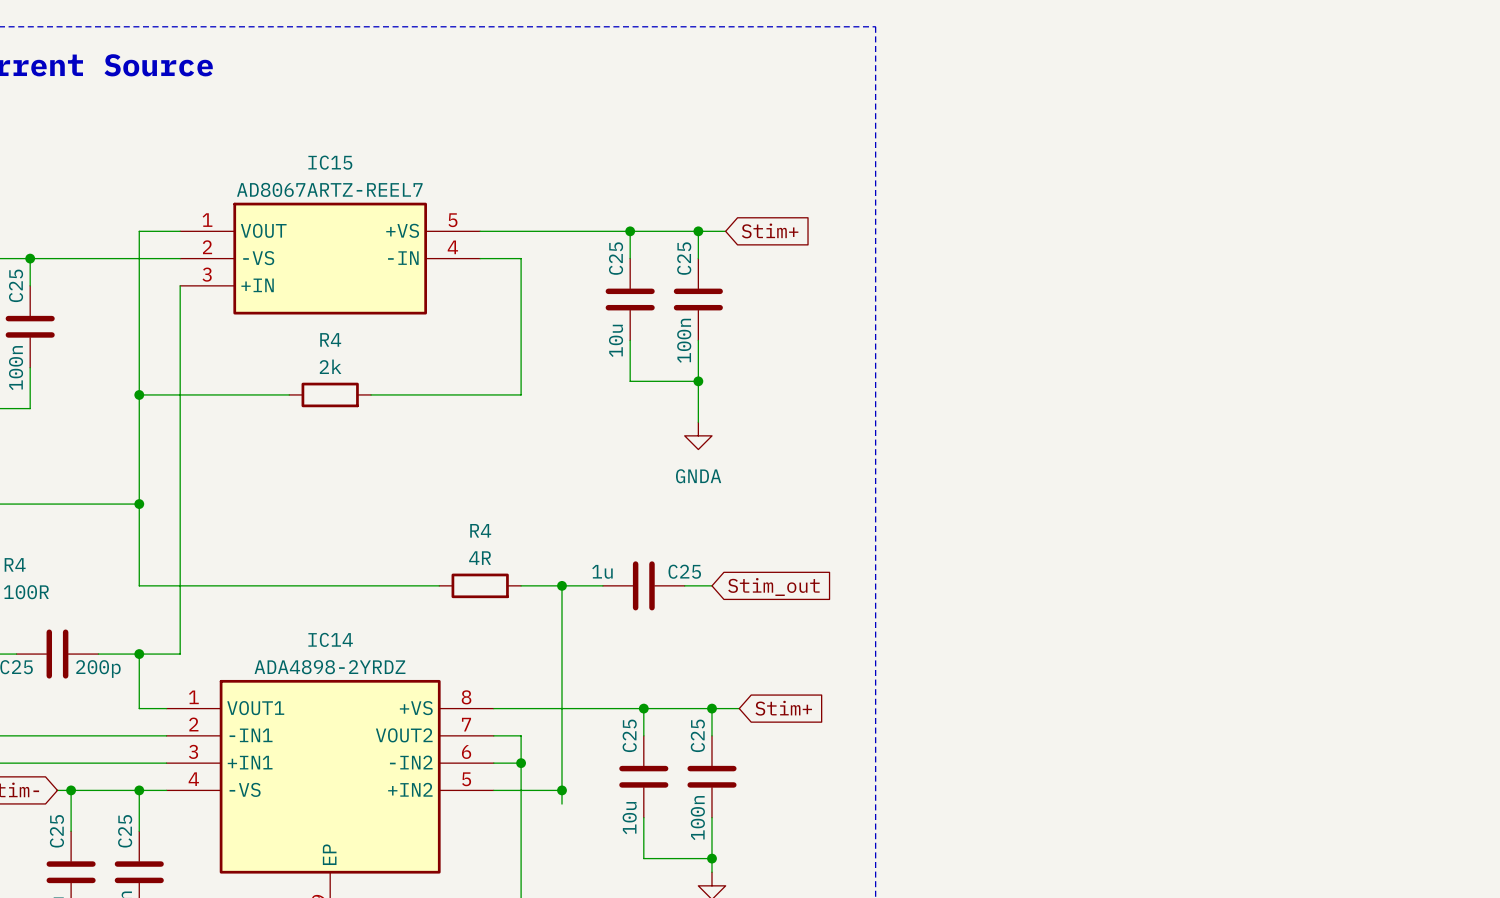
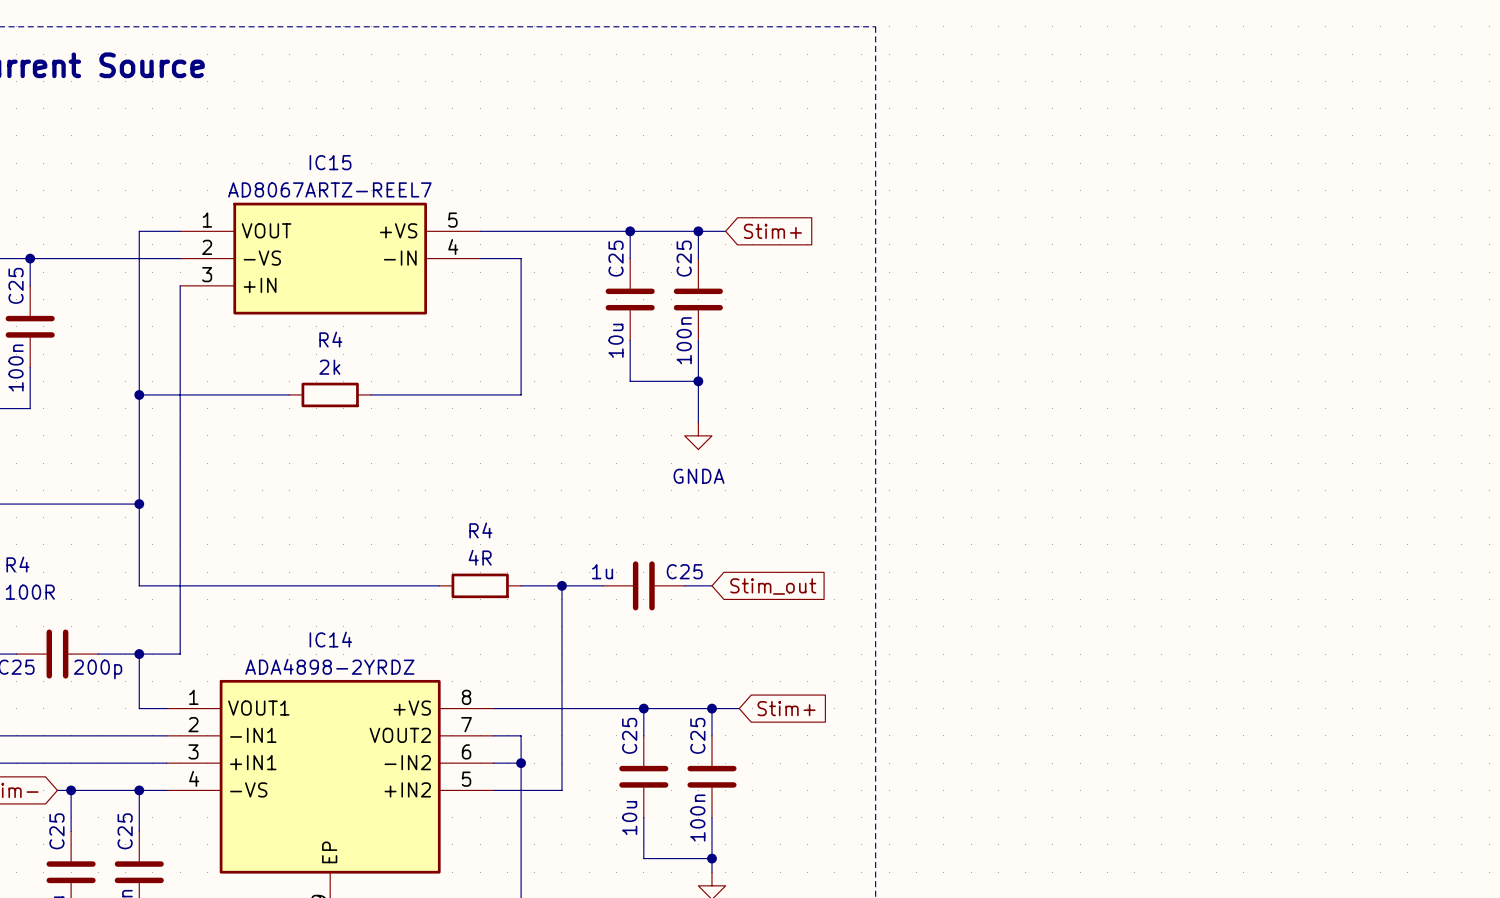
wire: (561, 790) (561, 804) -> none
junction: (561, 790) -> none

